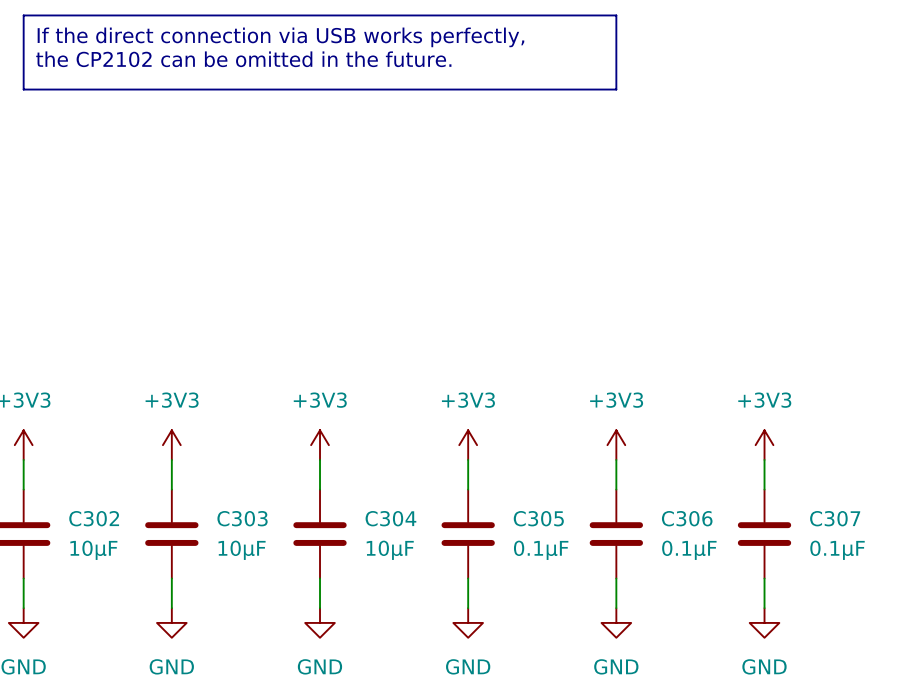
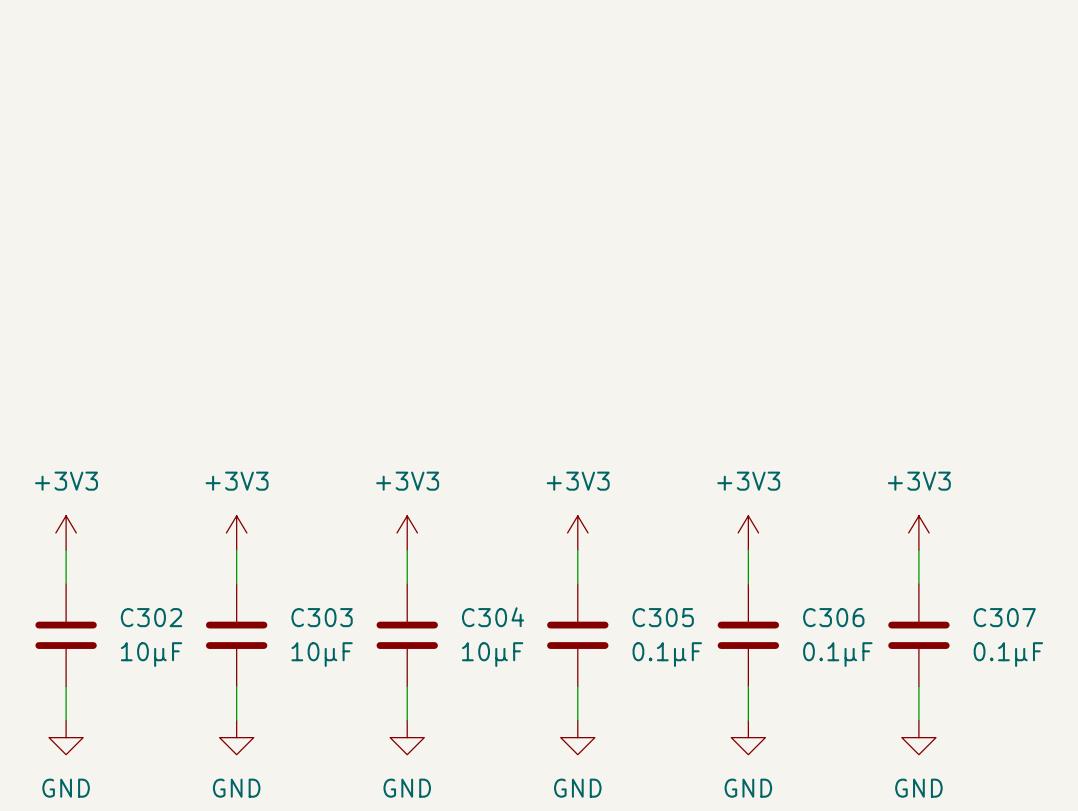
line: (23, 15) (616, 15) (616, 89) (23, 89) (23, 15) -> none
text: If the direct connection via USB works perfectly, (280, 37) -> none
text: the CP2102 can be omitted in the future. (243, 59) -> none

